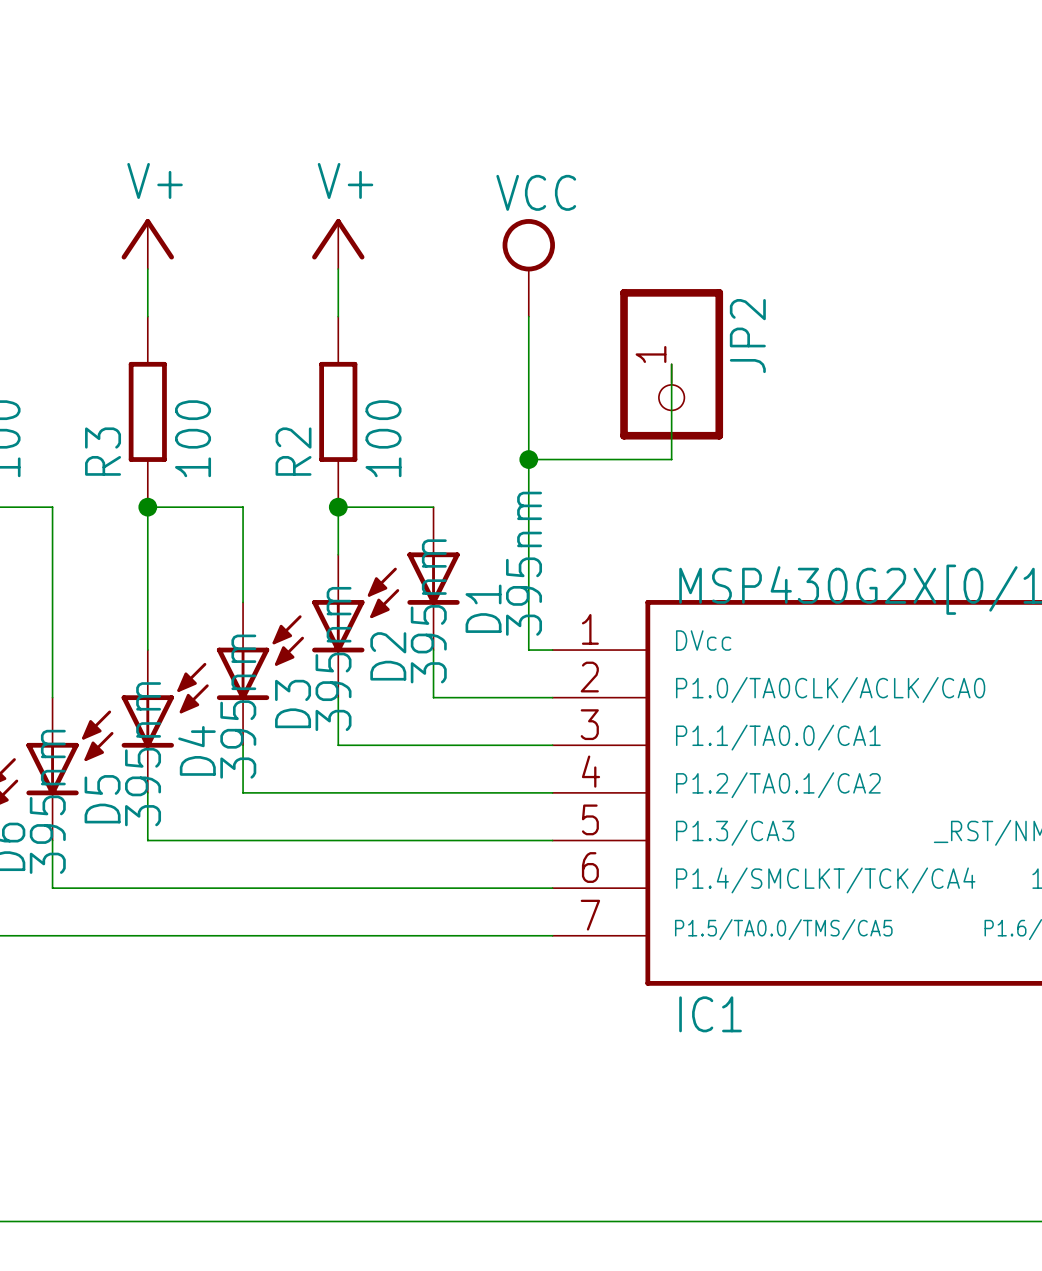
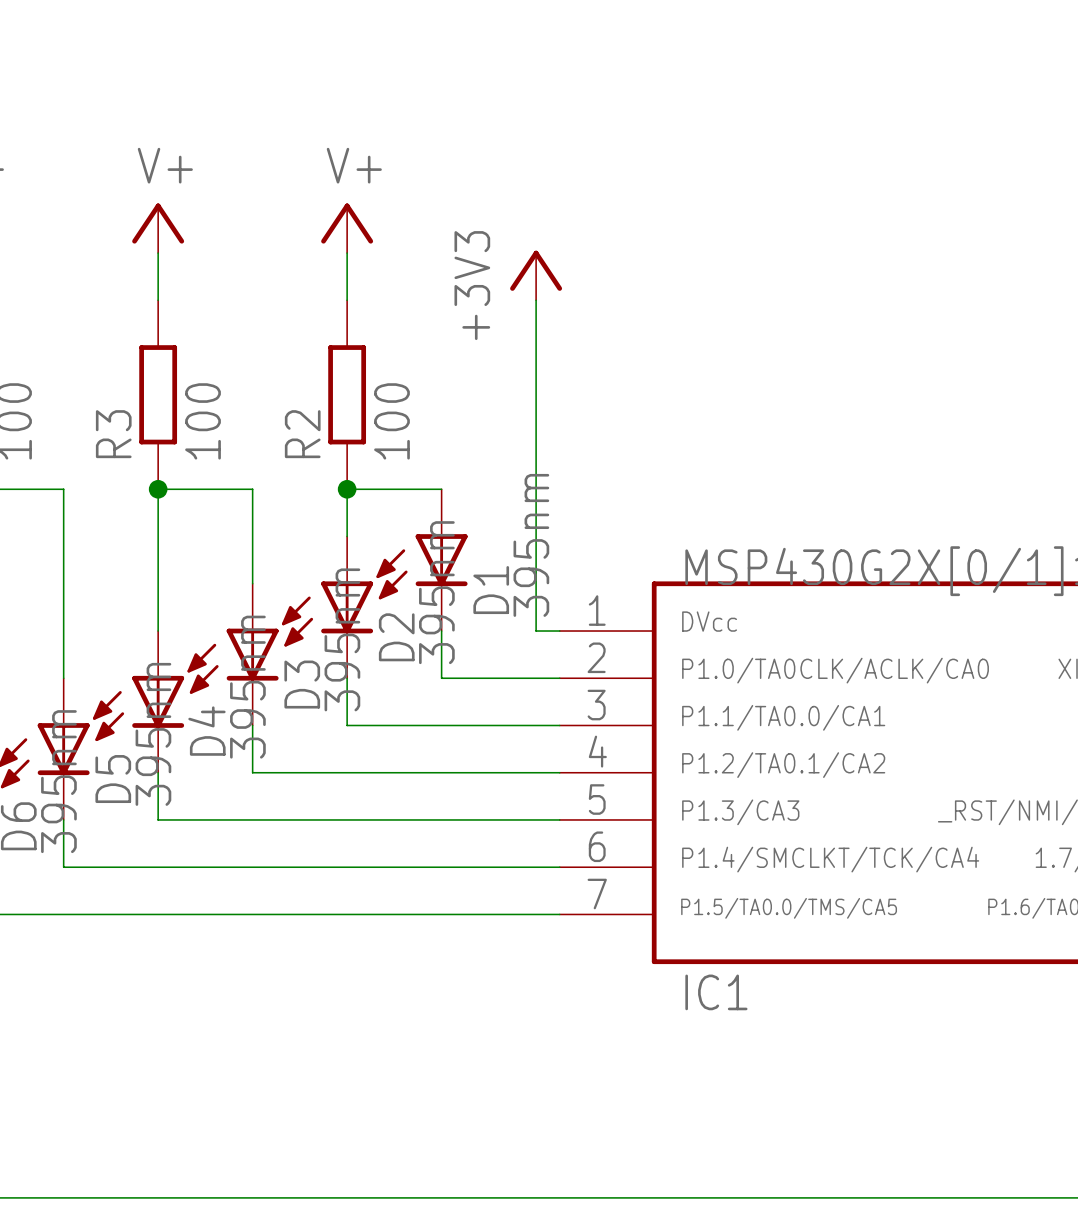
power symbol: VCC (528, 267) -> none
power symbol: none -> +3V3 (536, 275)
wire: (671, 364) (671, 459) (528, 459) -> none
JP2: (671, 364) -> none
junction: (528, 459) -> none

